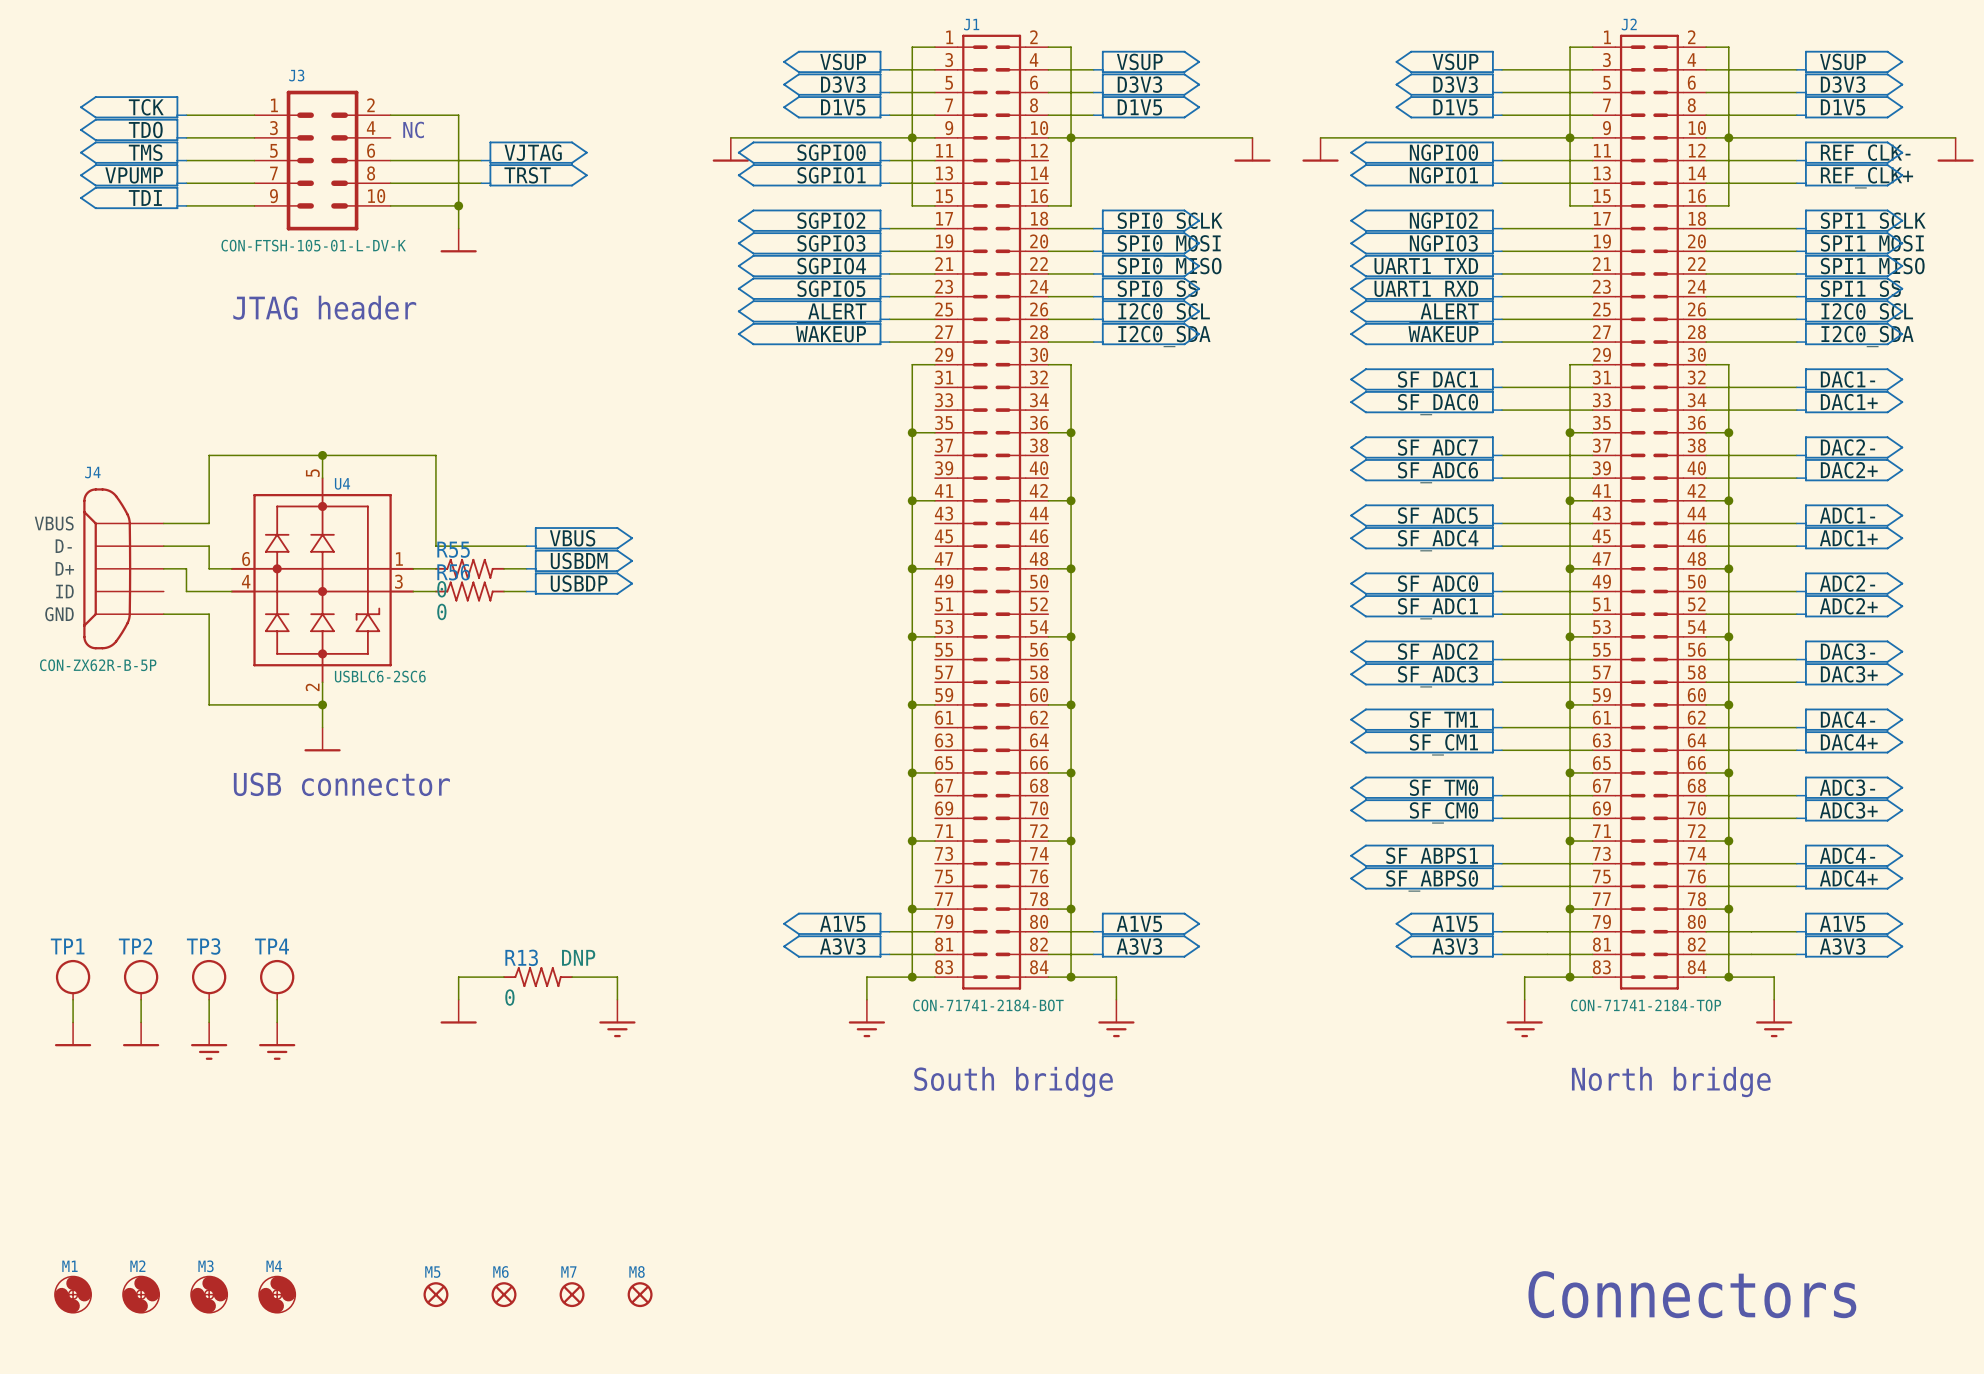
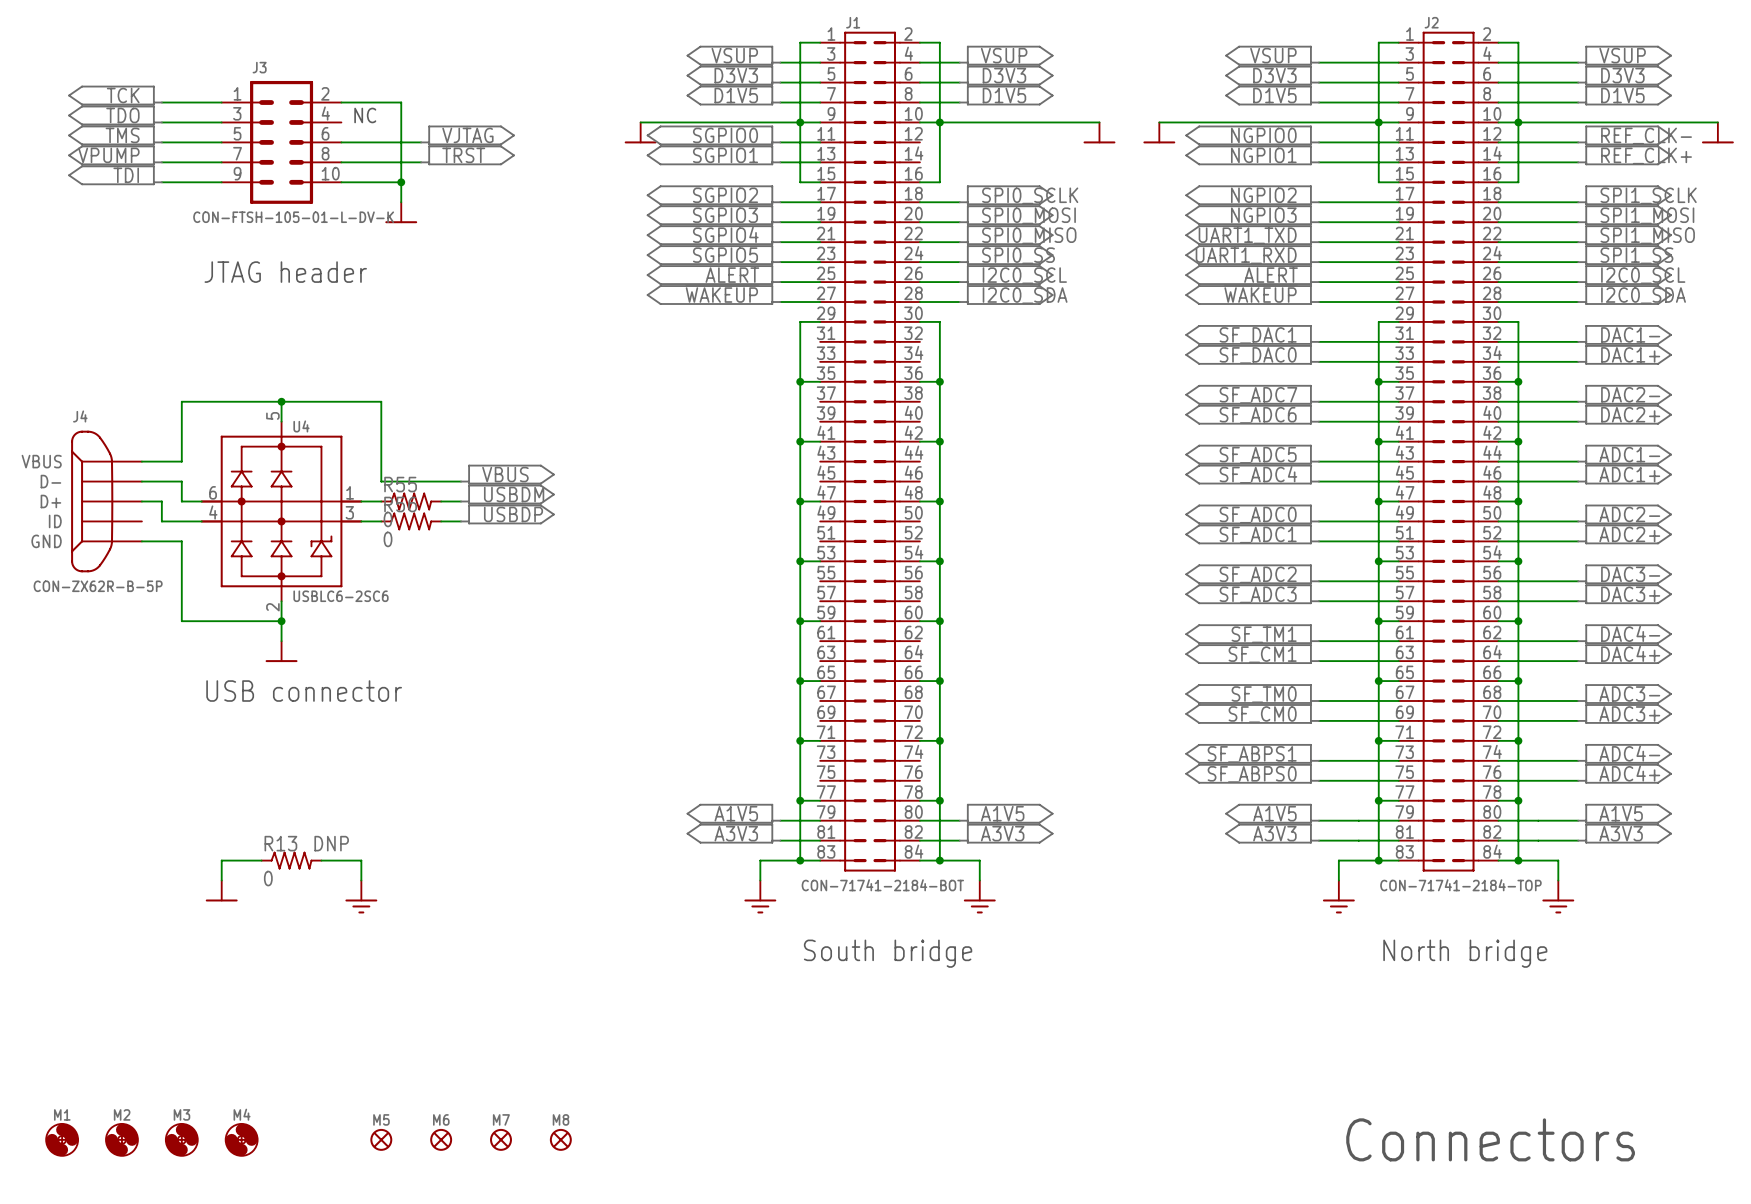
wire: (504, 977) (458, 977) (458, 999) -> (261, 860) (221, 860) (221, 880)
R13 position: (538, 977) -> (291, 860)
wire: (572, 977) (617, 977) (617, 999) -> (321, 860) (361, 860) (361, 880)
TP1: (73, 980) -> none
TP2: (141, 980) -> none
TP3: (209, 980) -> none
TP4: (277, 980) -> none
wire: (73, 999) (73, 1022) -> none
wire: (141, 999) (141, 1022) -> none
wire: (209, 999) (209, 1022) -> none
wire: (277, 999) (277, 1022) -> none
power symbol: none -> (221, 891)
power symbol: (458, 1011) -> none
power symbol: none -> (361, 896)
power symbol: (617, 1018) -> none
power symbol: (73, 1034) -> none
power symbol: (141, 1034) -> none
power symbol: (209, 1041) -> none
power symbol: (277, 1041) -> none

